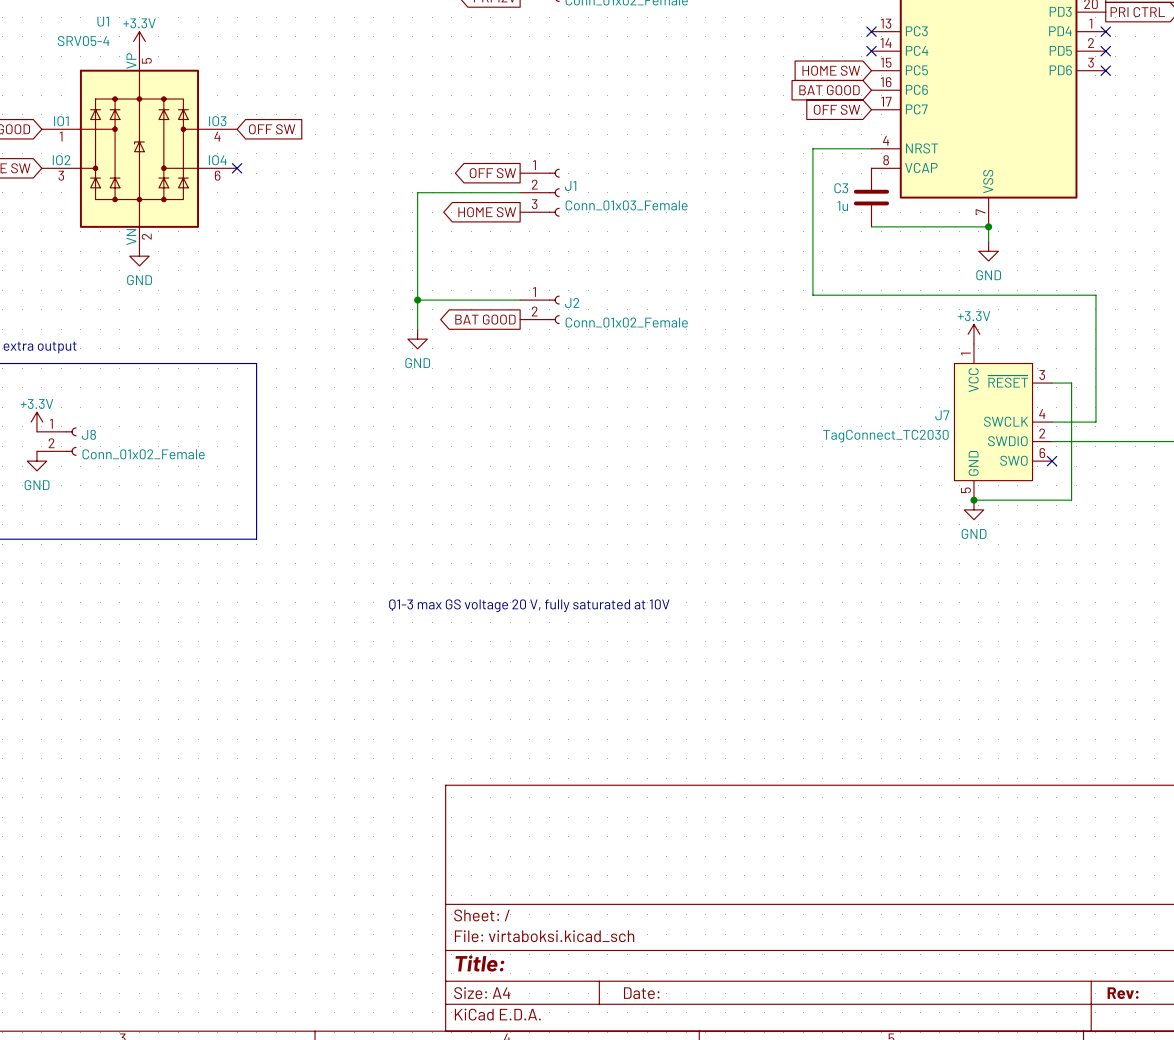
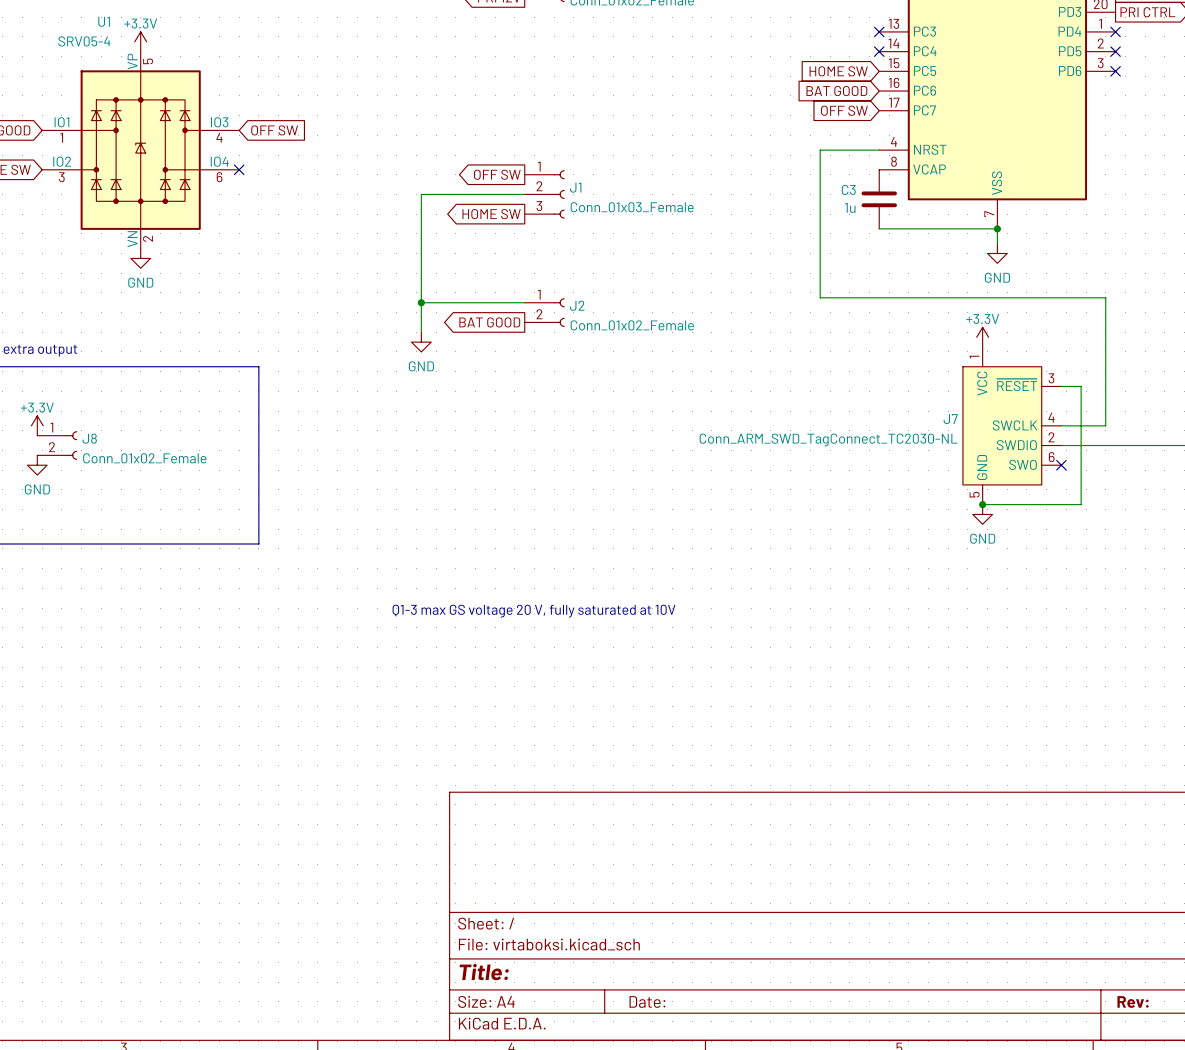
J7 value: TagConnect_TC2030 (885, 436) -> Conn_ARM_SWD_TagConnect_TC2030-NL (828, 440)

